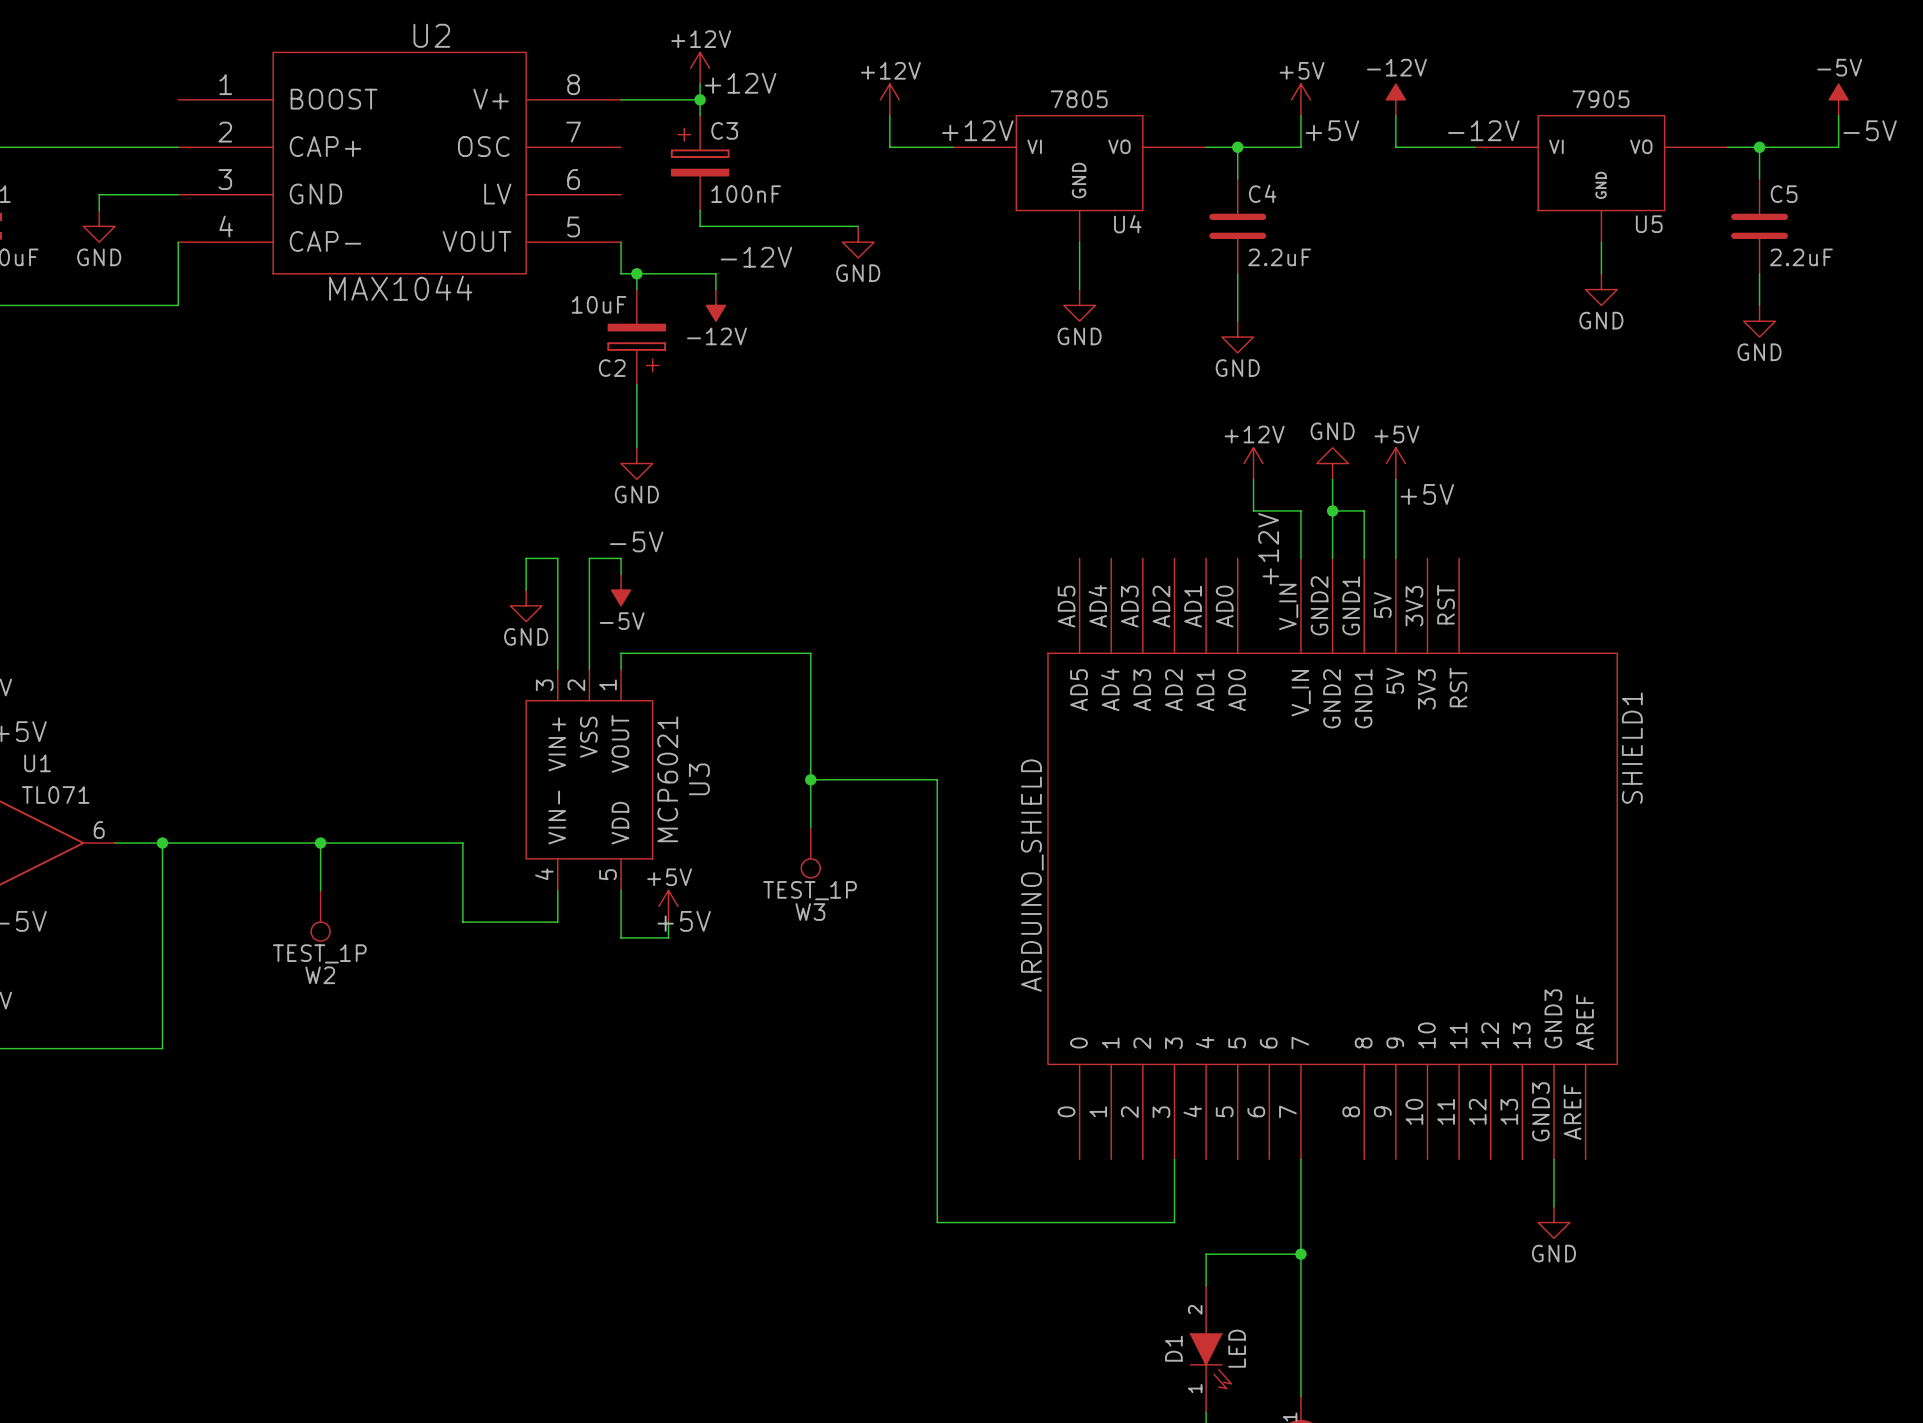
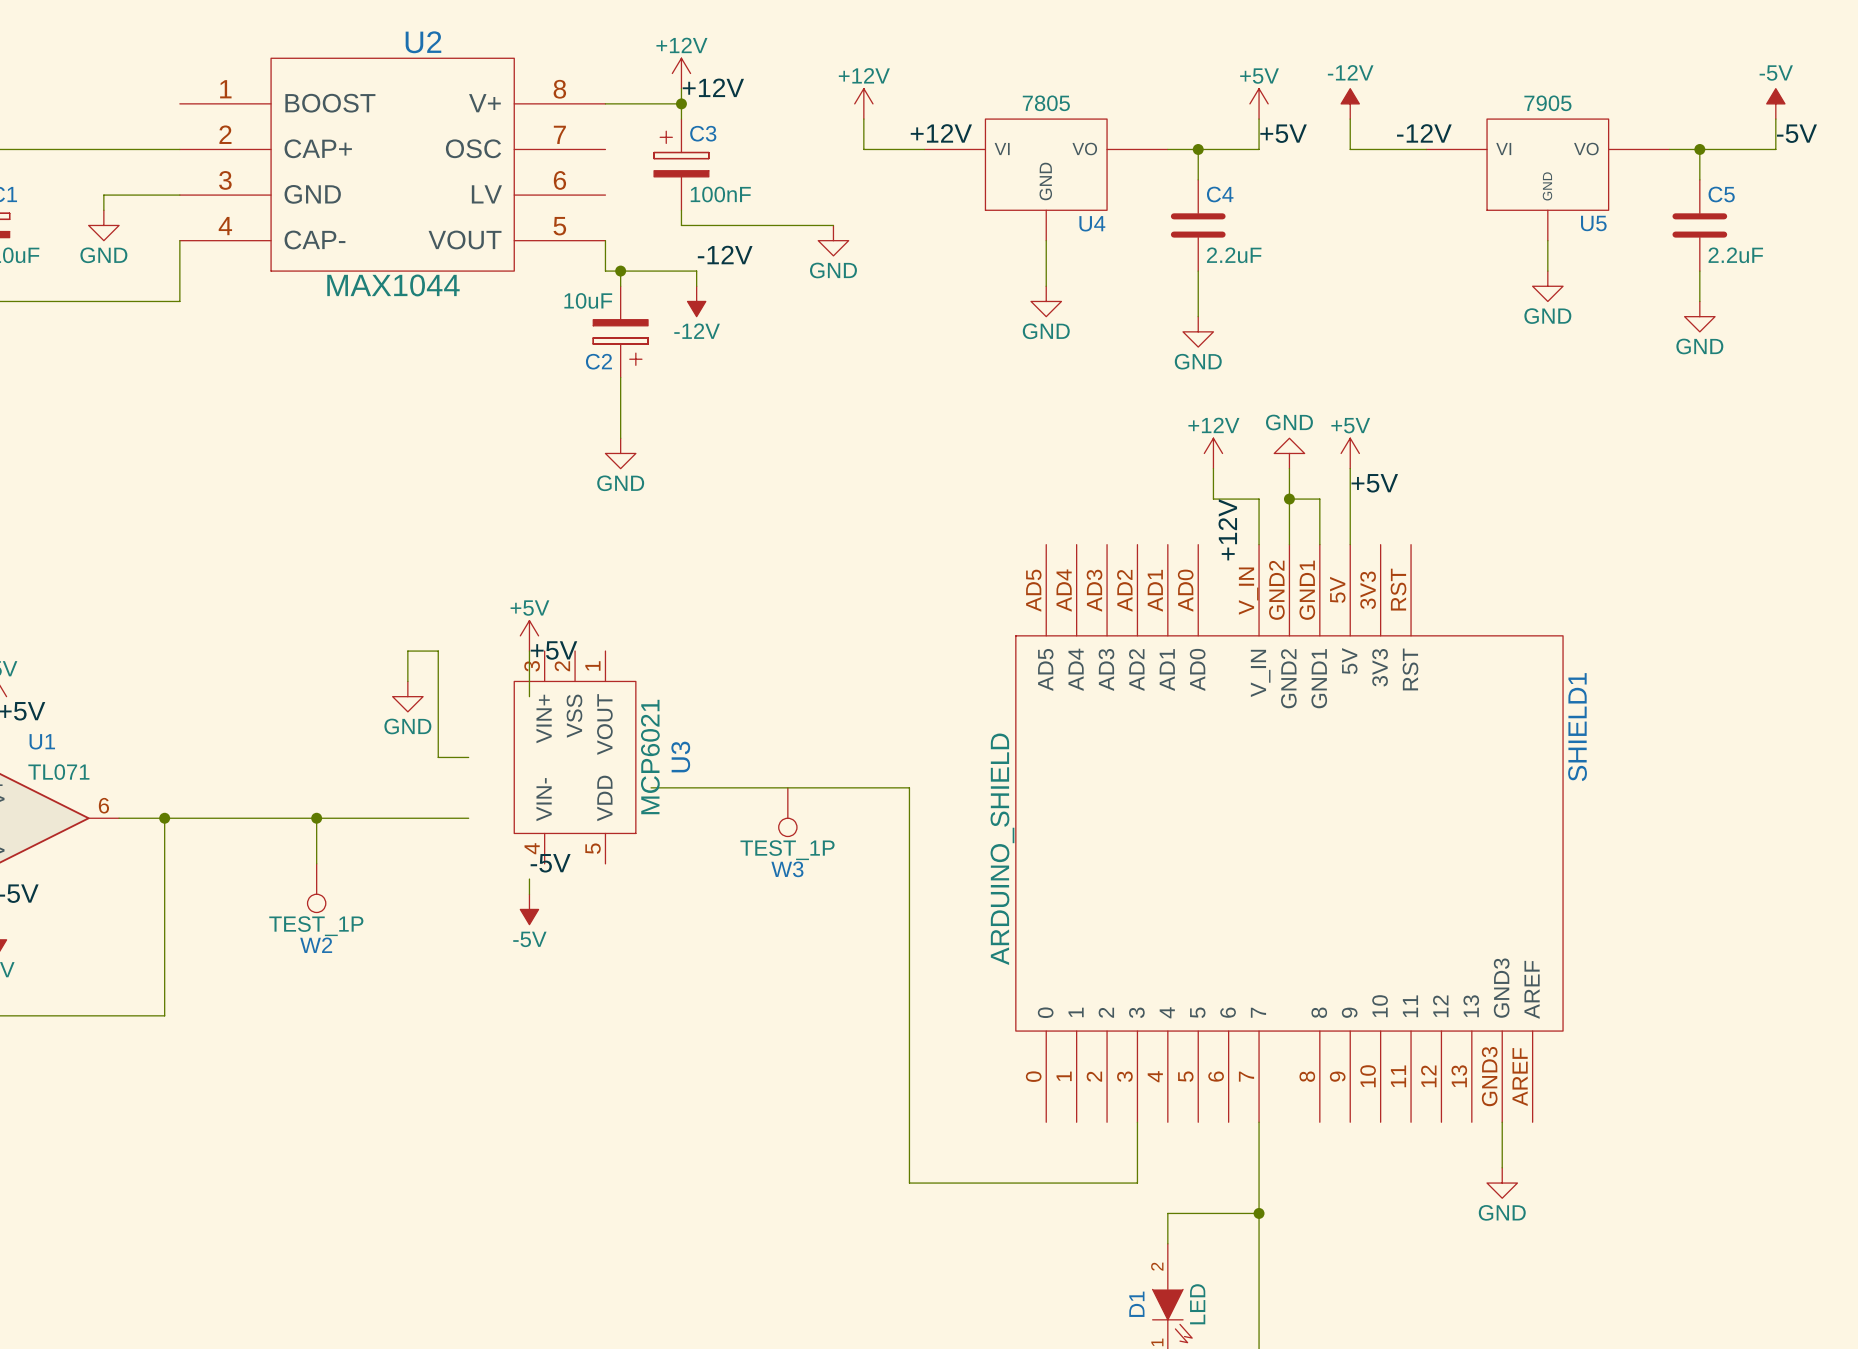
label: -5V (636, 541) -> none
wire: (621, 574) (621, 558) (589, 558) (589, 669) -> none
wire: (526, 590) (526, 558) (557, 558) (557, 669) -> none
power symbol: -5V (621, 590) -> none
power symbol position: GND (526, 605) -> GND (407, 696)
wire: none -> (529, 651) (529, 696)
wire: (621, 669) (621, 653) (810, 653) (810, 827) -> none
wire: none -> (407, 681) (407, 651) (438, 651) (438, 757) (468, 757)
wire: (810, 779) (937, 779) (937, 811) -> (651, 787) (909, 787)
junction: (810, 779) -> none
wire: (462, 843) (462, 922) (557, 922) (557, 890) -> (453, 818) (468, 818)
W3 position: (810, 852) -> (787, 812)
label: none -> -5V (550, 863)
wire: (621, 890) (621, 937) (668, 937) (668, 922) -> none
wire: none -> (529, 879) (529, 894)
power symbol position: +5V (668, 906) -> +5V (529, 635)
label position: +5V (684, 921) -> +5V (554, 650)
power symbol: none -> -5V (529, 909)

